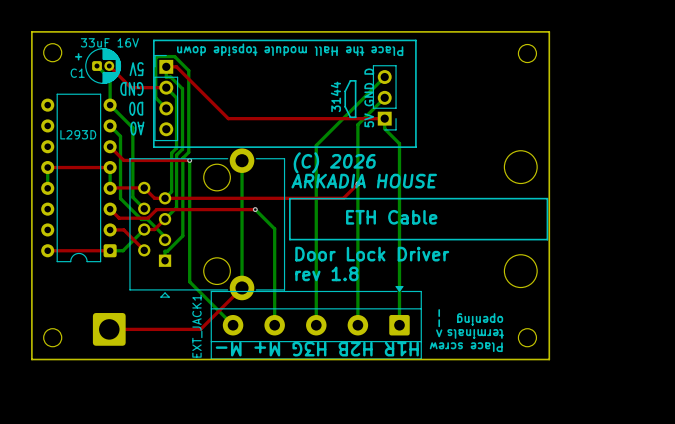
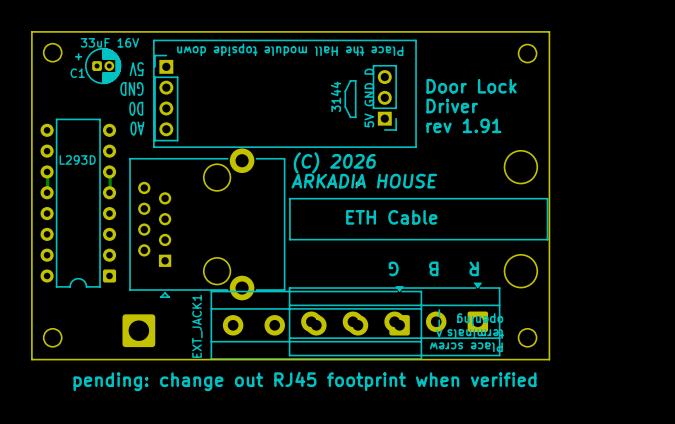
bottom track: (97, 66) (110, 79) (110, 105) (132, 127) (132, 197) (144, 208) -> none
top track: (109, 66) (130, 87) (166, 87) -> none
bottom track: (166, 66) (166, 77) (170, 77) (182, 88) (182, 149) (176, 155) (176, 207) (165, 219) -> none
top track: (166, 66) (176, 66) (228, 118) (384, 118) -> none
bottom track: (384, 77) (316, 145) (316, 325) -> none
text: none -> Door Lock (471, 86)
bottom track: (166, 87) (176, 97) (176, 148) (171, 153) (171, 191) (165, 198) -> none
bottom track: (384, 97) (357, 124) (357, 325) -> none
text: none -> Driver (452, 106)
bottom track: (166, 108) (155, 97) (155, 58) (157, 56) (174, 56) (188, 70) (188, 152) (182, 158) (182, 235) (167, 251) (165, 251) (165, 260) -> none
bottom track: (384, 118) (384, 128) (399, 143) (399, 325) -> none
bottom track: (110, 125) (120, 136) (120, 198) (141, 219) (147, 219) (165, 236) (165, 239) -> none
text: none -> rev 1.91 (463, 125)
top track: (110, 146) (123, 160) (189, 160) -> none
bottom track: (189, 160) (189, 281) (233, 325) -> none
via: (189, 160) -> none
bottom track: (242, 160) (242, 287) -> none
top track: (47, 167) (110, 167) -> none
part position: (78, 177) -> (78, 203)
top track: (357, 183) (343, 198) (154, 198) (144, 187) (110, 188) -> none
top track: (110, 209) (119, 218) (148, 218) (156, 209) (255, 209) -> none
bottom track: (255, 209) (274, 228) (274, 325) -> none
via: (255, 209) -> none
top track: (165, 219) (154, 229) (144, 229) -> none
top track: (110, 229) (123, 229) (144, 250) -> none
bottom track: (144, 229) (123, 250) (110, 250) -> none
top track: (47, 250) (110, 250) -> none
text: Door Lock Driver (372, 254) -> none
text: none -> R B G (433, 268)
text: rev 1.8 (326, 273) -> none
top track: (242, 287) (200, 329) (109, 329) -> none
part: none -> (394, 319)
part position: (109, 329) -> (138, 330)
text: H1R H2B H3G M+ M- (317, 349) -> none
text: none -> pending: change out RJ45 footprint when verified (304, 381)

